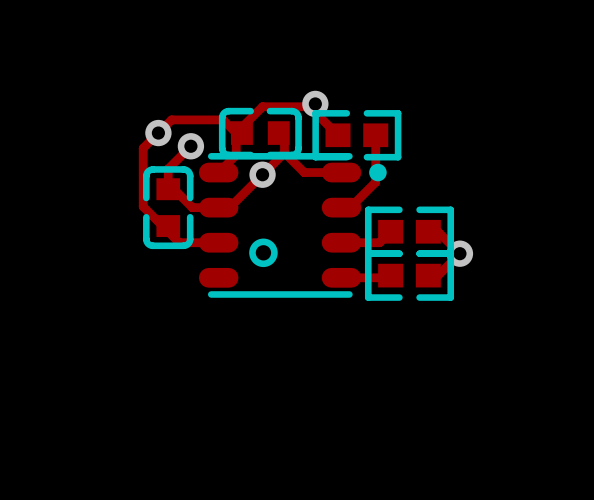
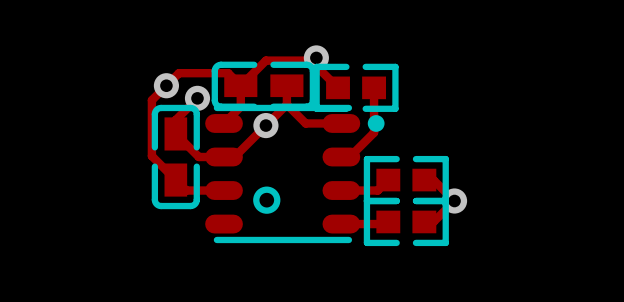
part footprint: [218, 107, 302, 159] -> [211, 61, 317, 110]
part footprint: [143, 166, 194, 250] -> [151, 104, 200, 210]

